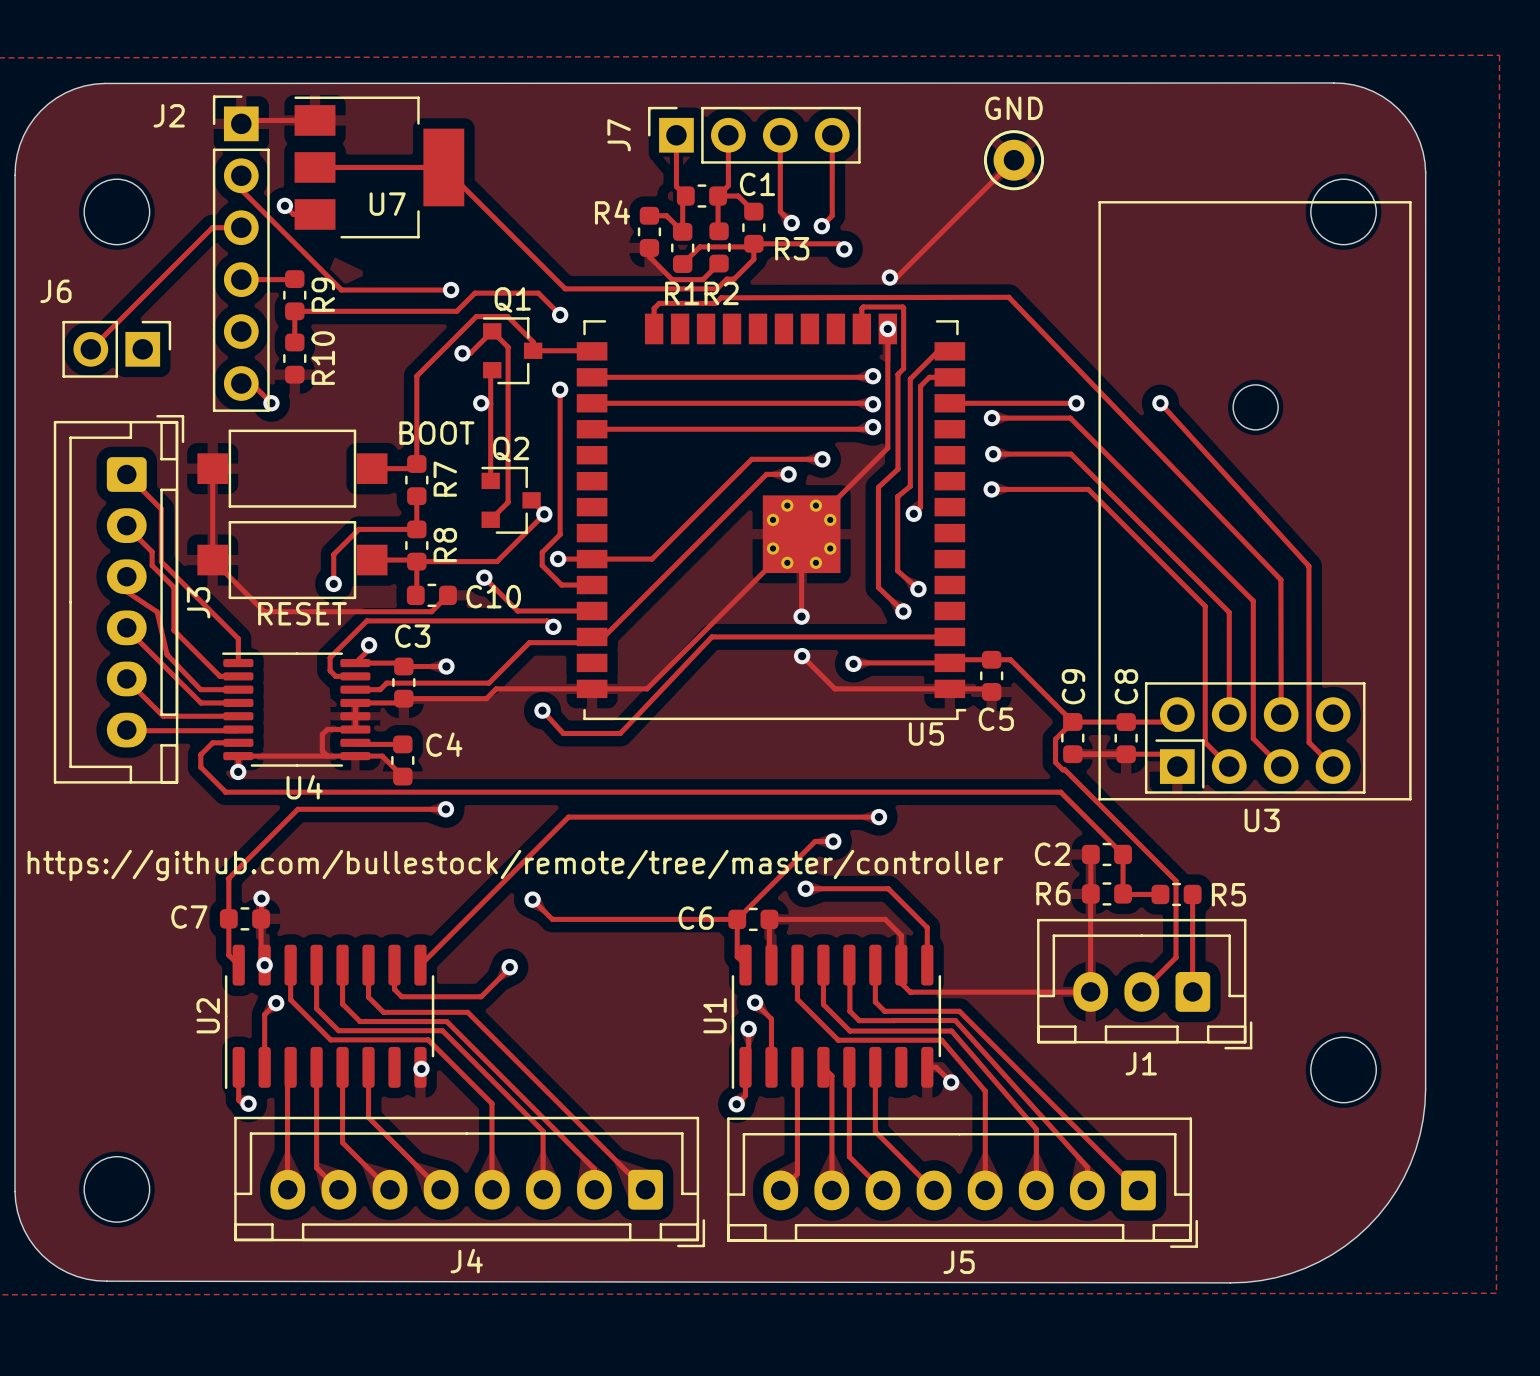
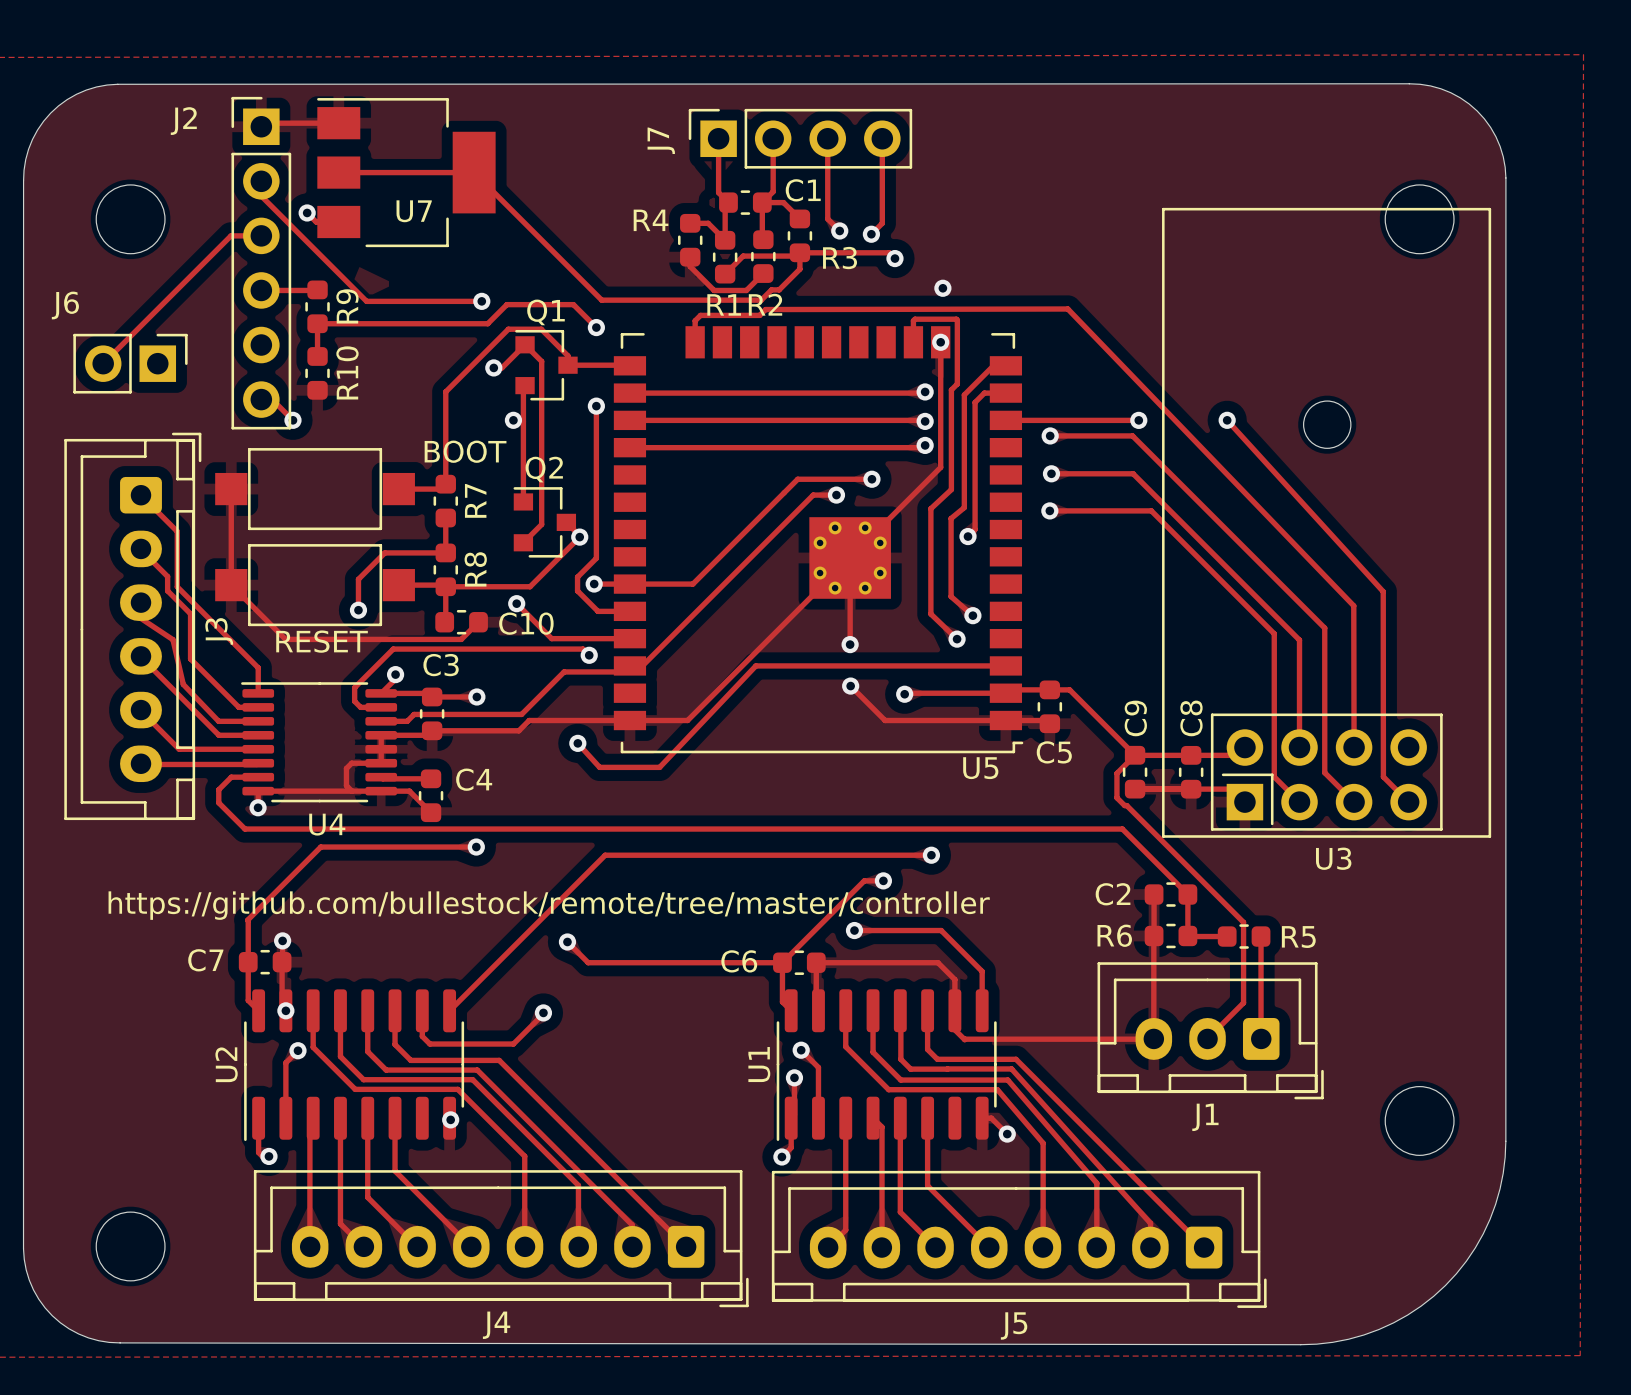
track: (1014, 160) (896, 277) (889, 277) -> none
GND: (1014, 160) -> none

